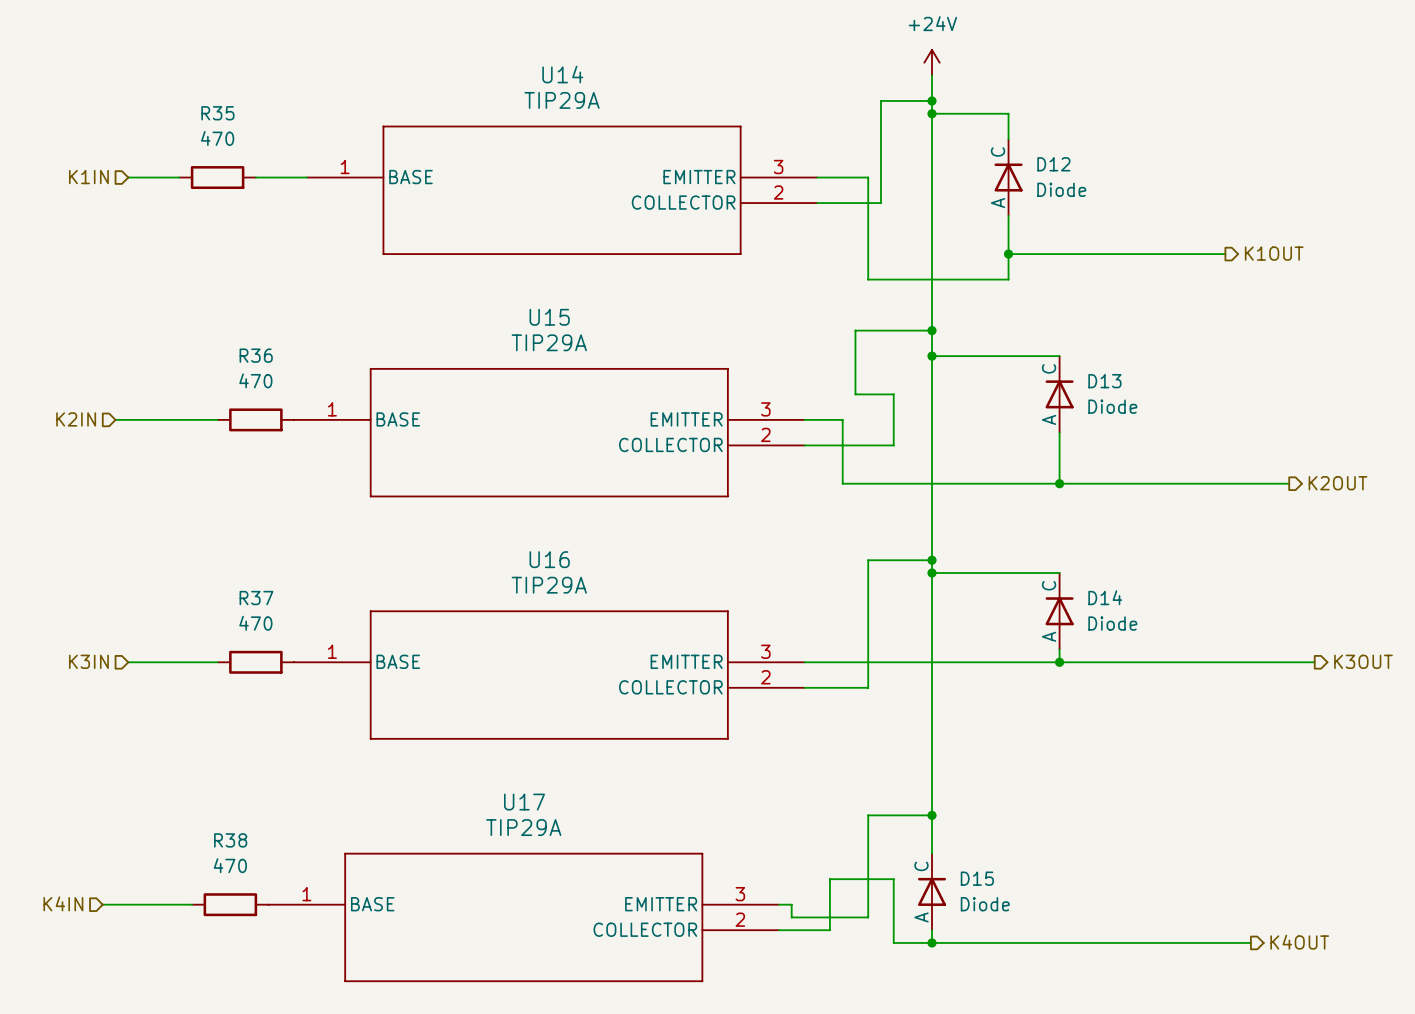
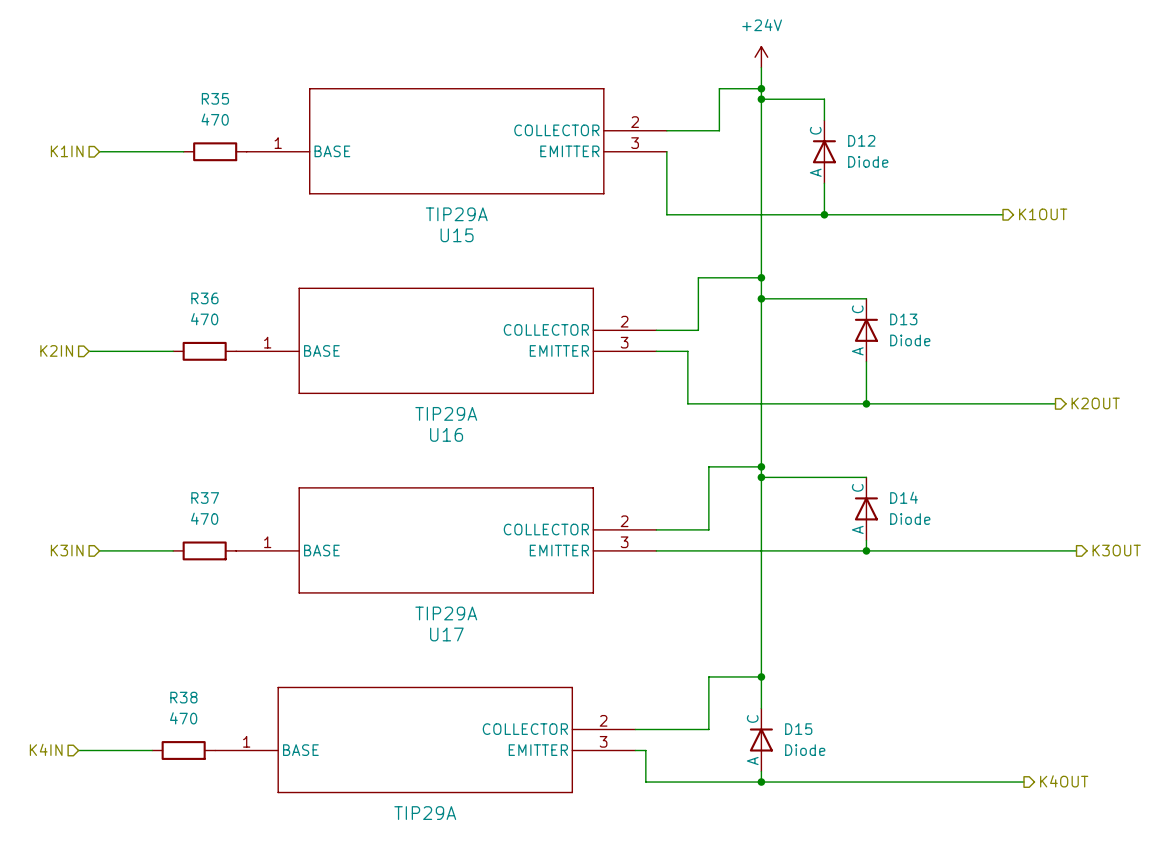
wire: (880, 152) (880, 203) (817, 203) -> (719, 130) (666, 130)
R35 position: (217, 177) -> (215, 151)
wire: (255, 177) (306, 177) -> (141, 151) (183, 151)
wire: (817, 177) (868, 177) (868, 279) (1008, 279) (1008, 254) -> (666, 151) (666, 214) (824, 214)
U14: TIP29A (562, 190) -> none
wire: (855, 394) (893, 394) (893, 445) (804, 445) -> (698, 330) (656, 330)
U15 flip: as is (549, 432) -> up-down (456, 141)
wire: (868, 636) (868, 687) (804, 687) -> (708, 529) (656, 529)
U16 flip: as is (549, 675) -> up-down (446, 340)
wire: (829, 879) (829, 930) (778, 930) -> (677, 729) (635, 729)
part: none -> TIP29A (425, 740)
U17 flip: as is (523, 917) -> up-down (446, 540)
wire: (791, 917) (868, 917) (868, 879) (893, 879) (893, 942) -> (645, 761) (645, 782) (729, 782)

